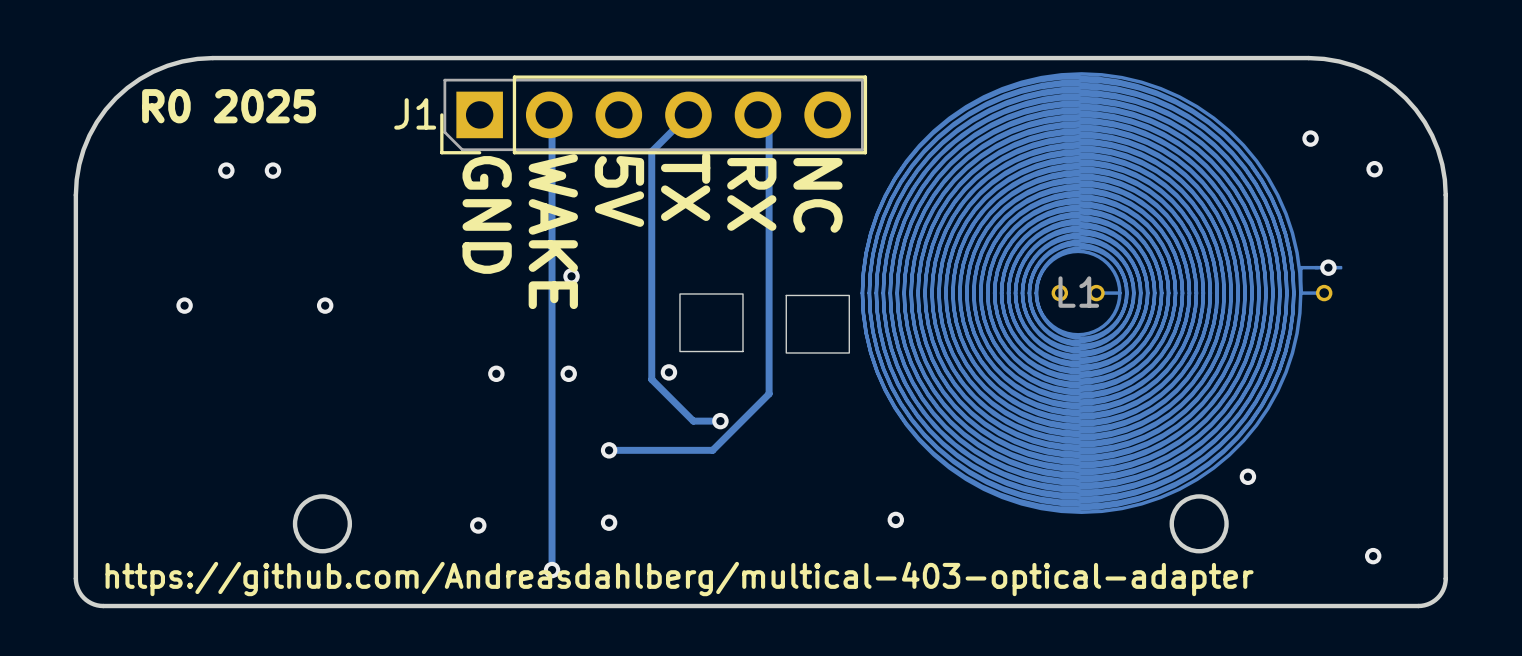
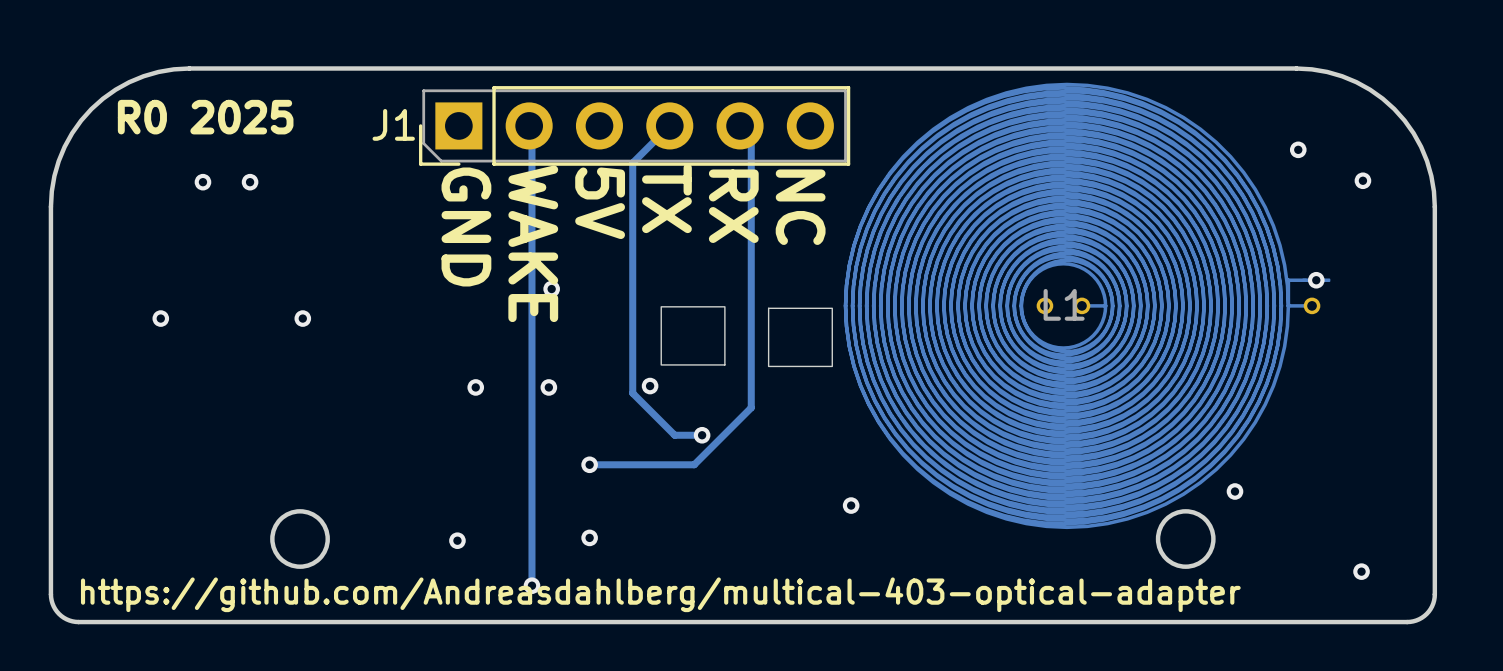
via position: (895, 519) -> (851, 505)

